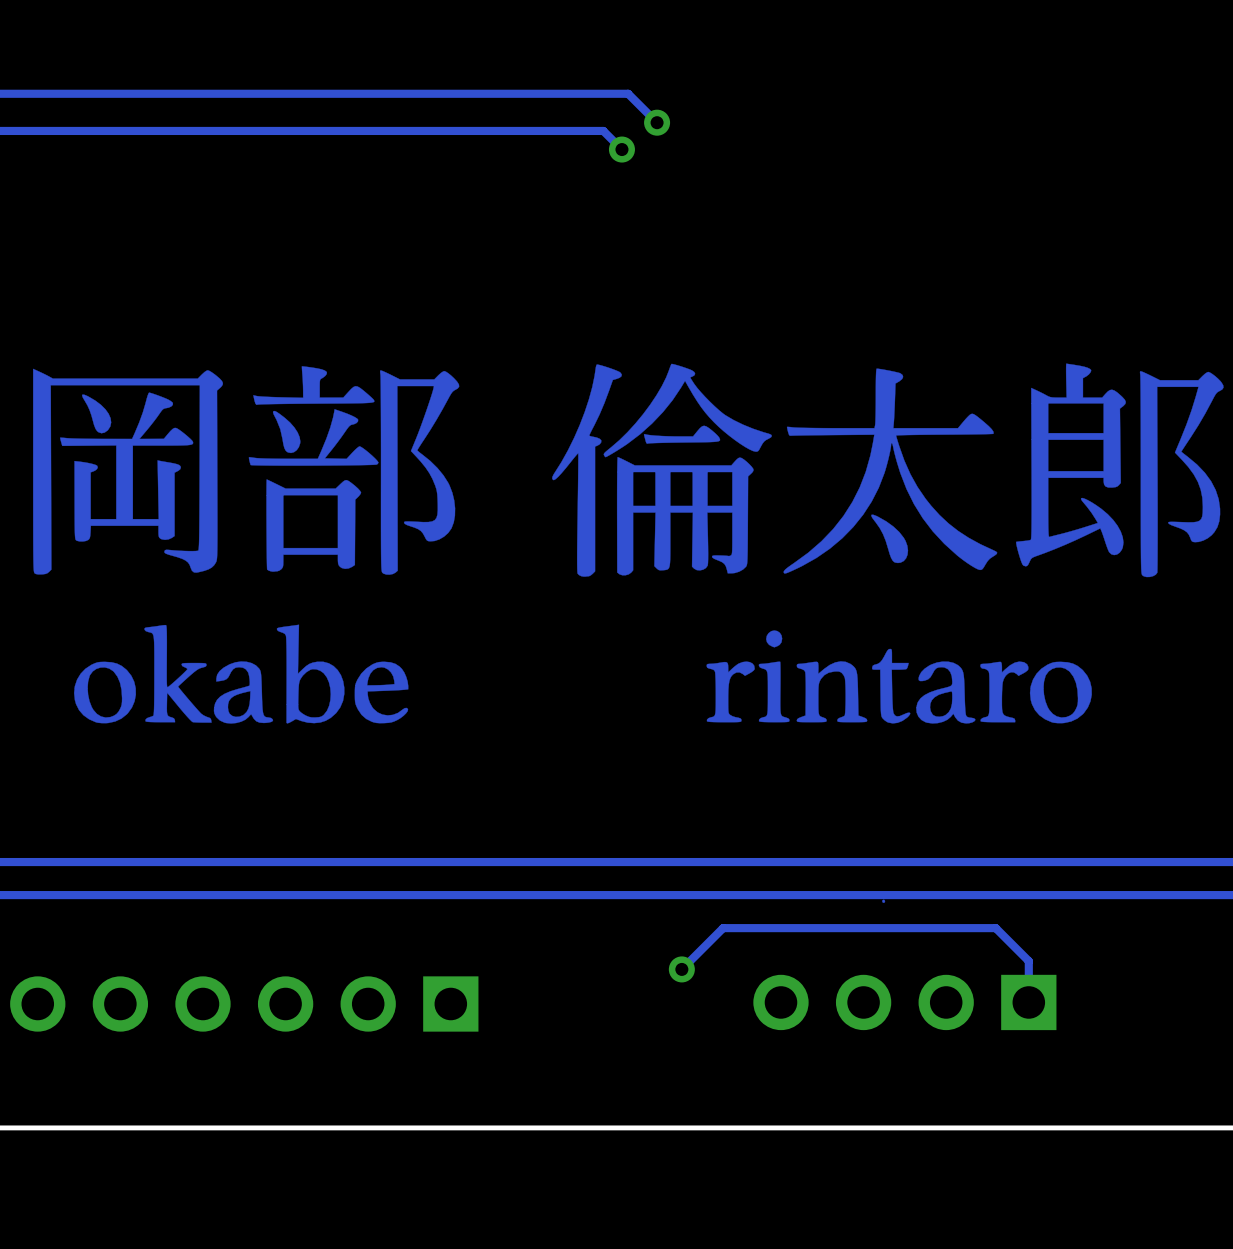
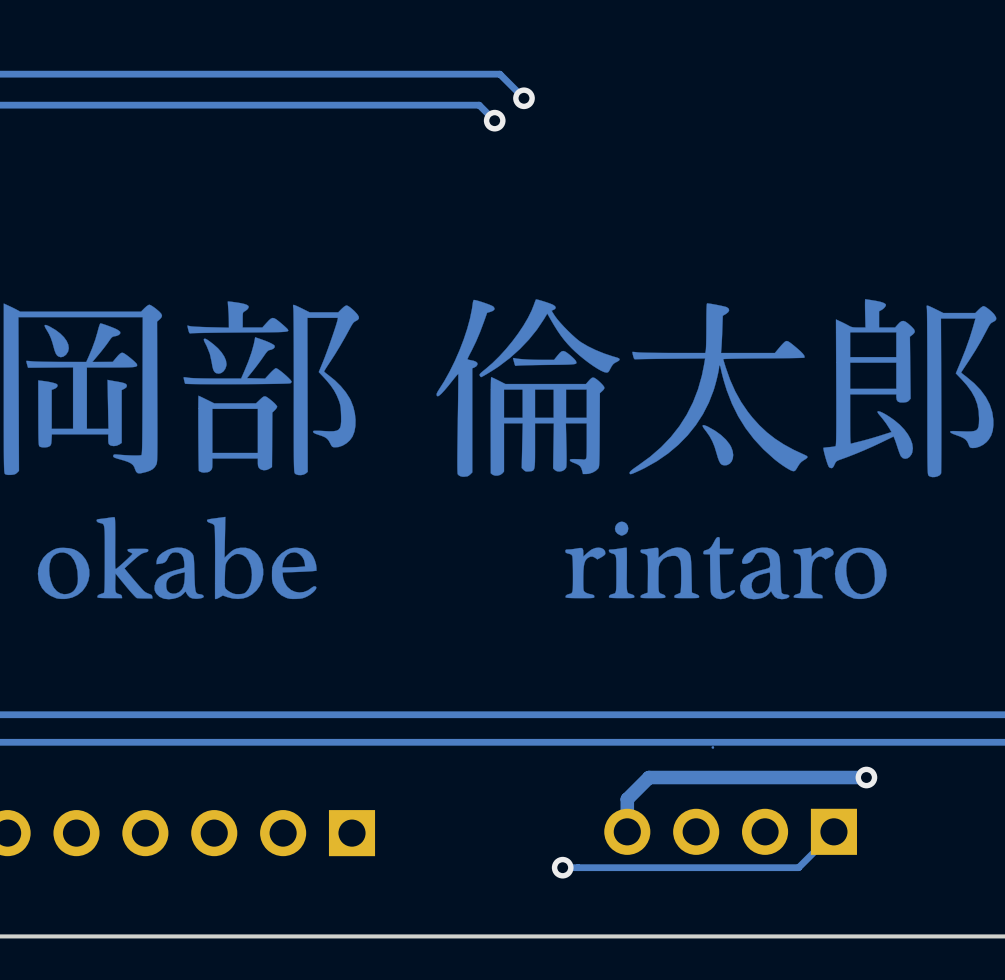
track: none -> (866, 777) (649, 777) (627, 799) (627, 831)
via: none -> (866, 777)
track: (681, 969) (723, 928) (995, 928) (1028, 961) (1028, 1002) -> (562, 867) (798, 867) (833, 832)
via position: (681, 969) -> (562, 867)

